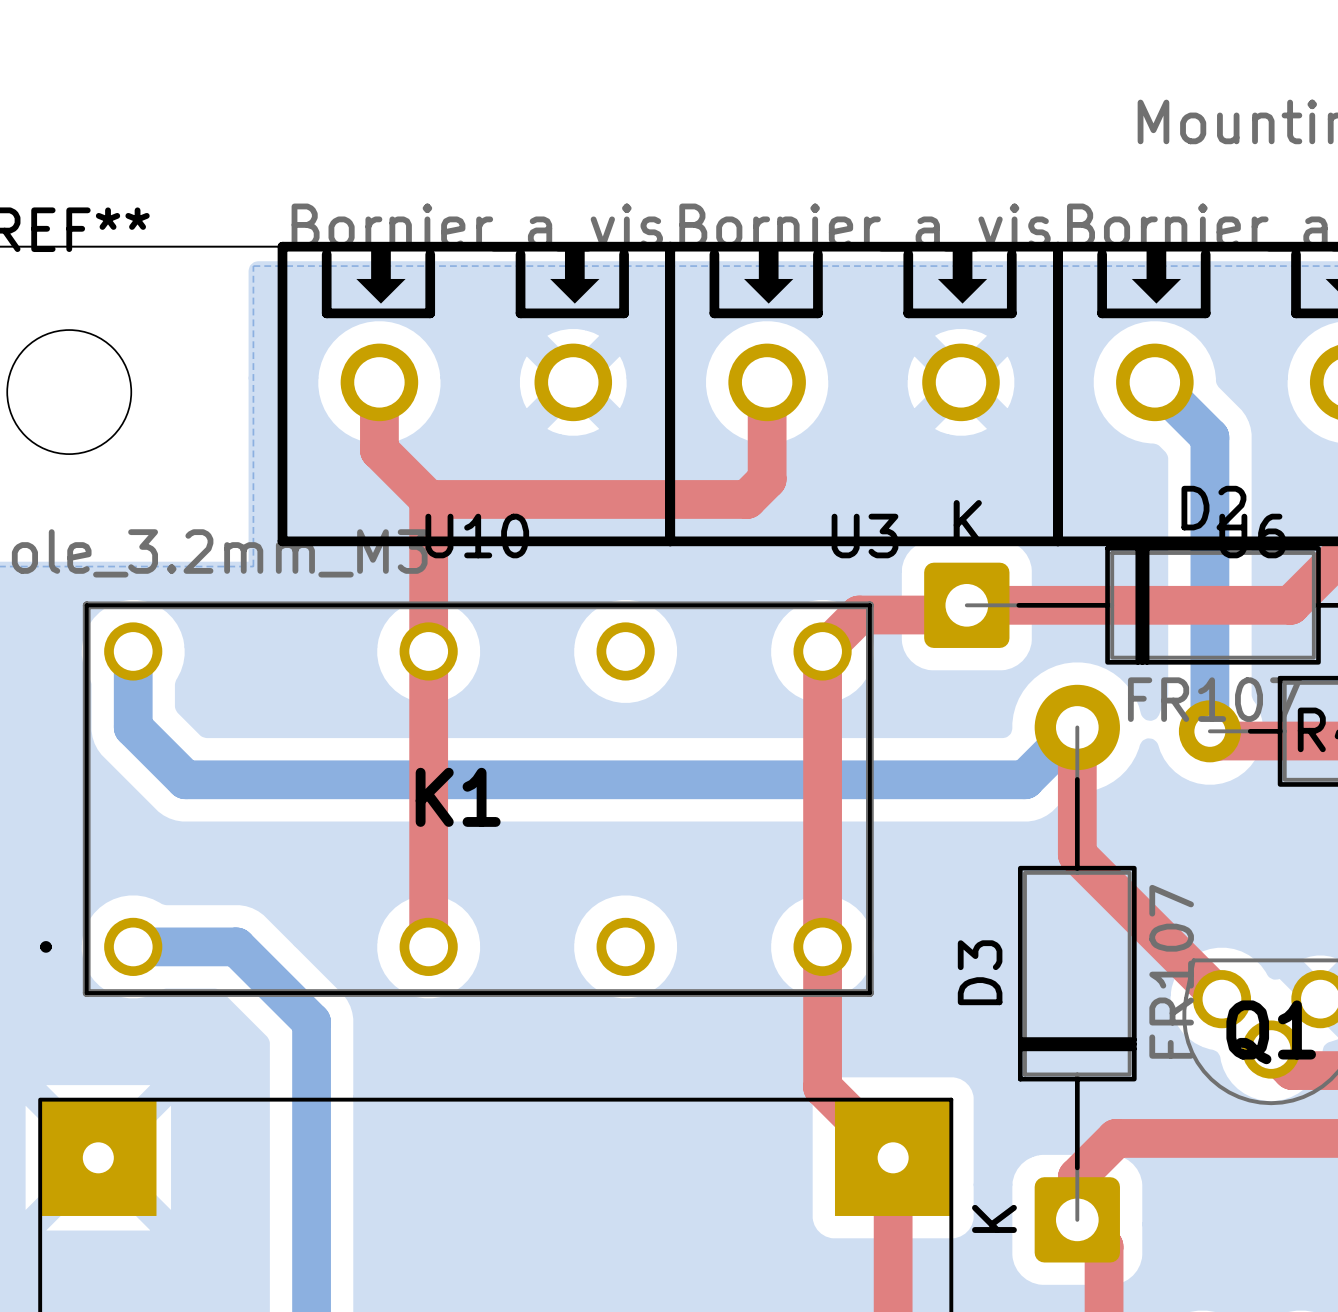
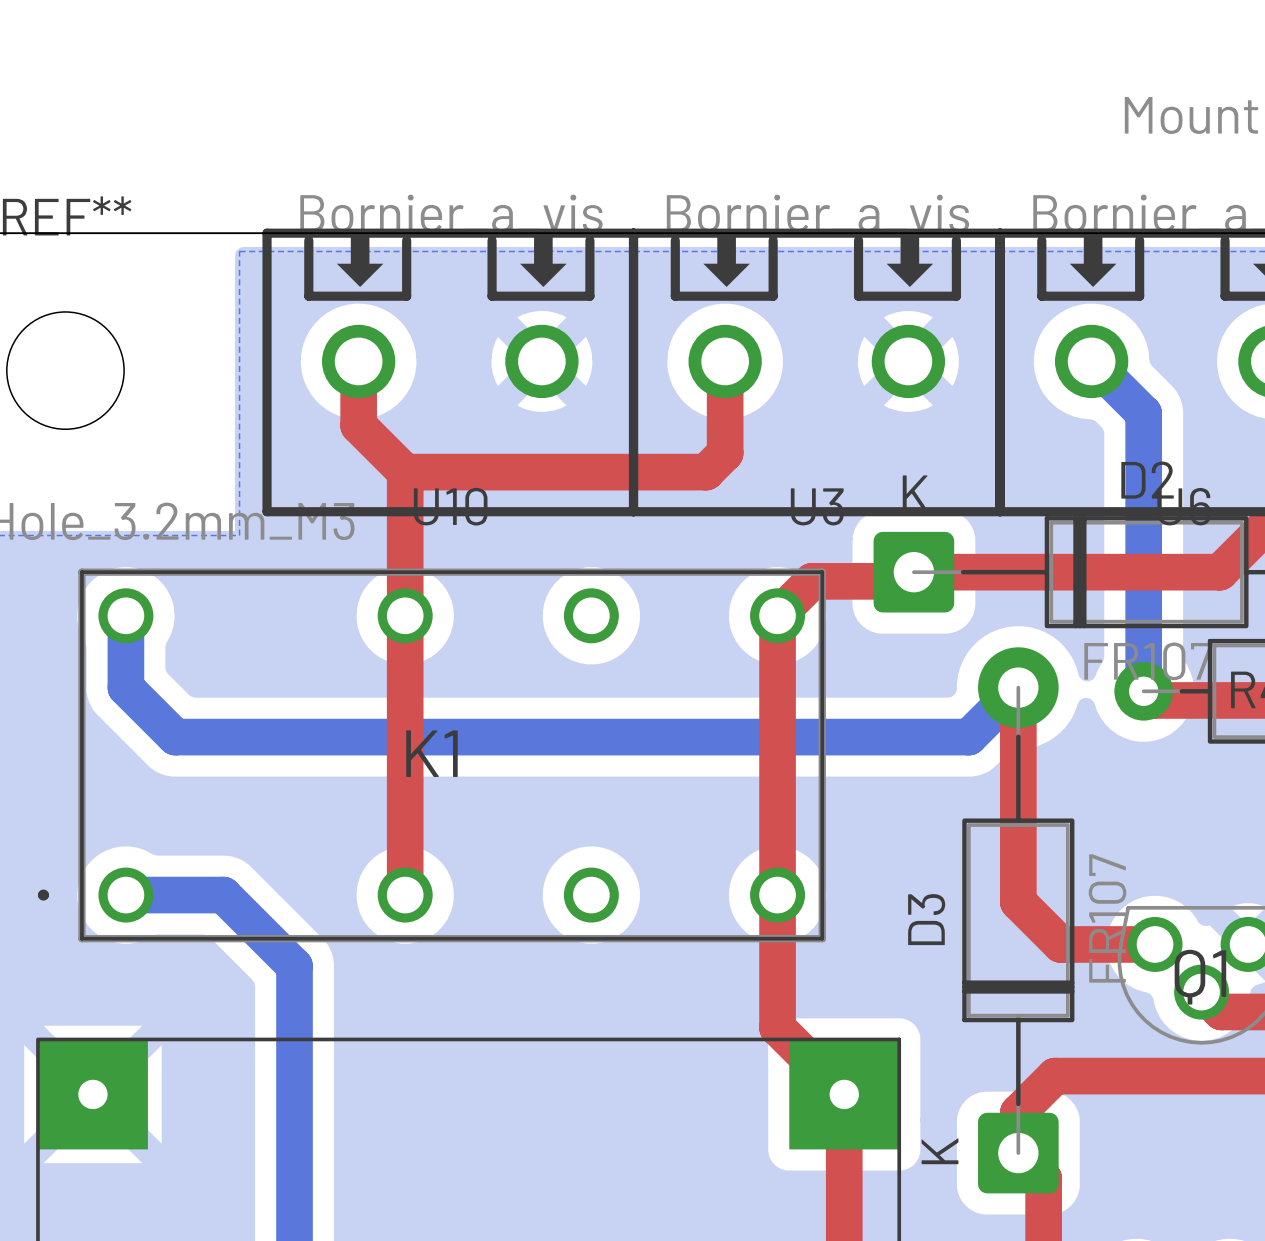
top track: (1077, 854) (1221, 999) -> (1018, 807) (1018, 902) (1060, 944) (1155, 944)

